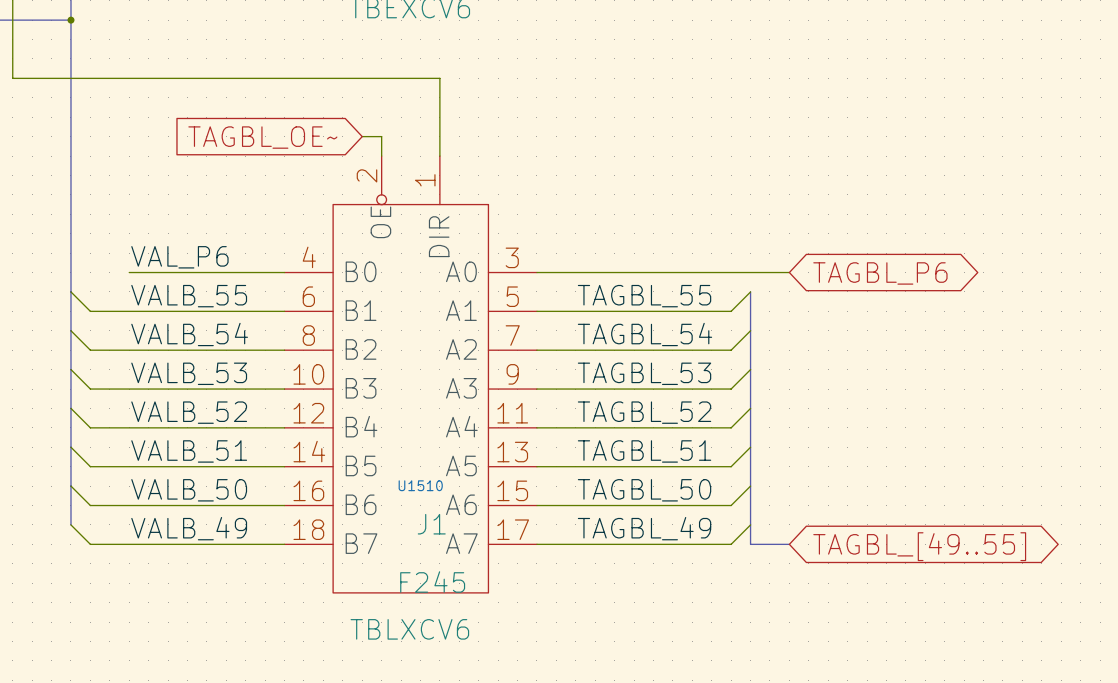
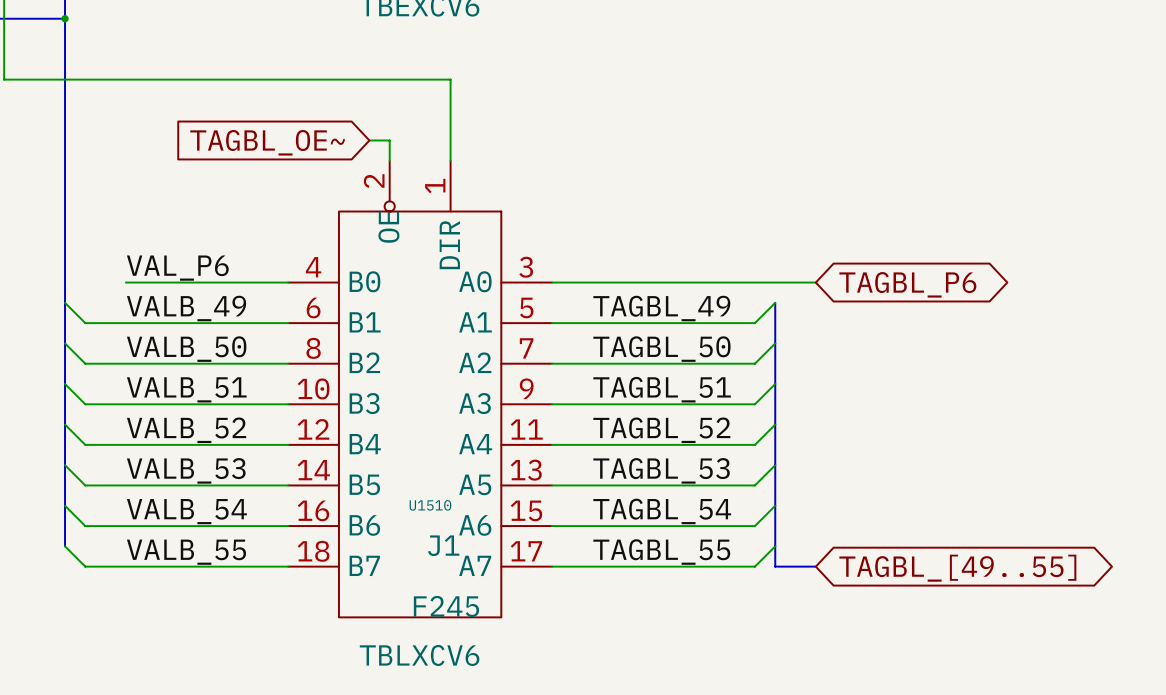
label: VALB_55 (189, 296) -> VALB_49 (186, 308)
label: TAGBL_55 (644, 296) -> TAGBL_49 (661, 308)
label: VALB_54 (189, 334) -> VALB_50 (186, 349)
label: TAGBL_54 (644, 334) -> TAGBL_50 (661, 349)
label: VALB_53 (189, 373) -> VALB_51 (186, 389)
label: TAGBL_53 (644, 373) -> TAGBL_51 (662, 389)
label: VALB_51 (189, 451) -> VALB_53 (186, 470)
label: TAGBL_51 (644, 451) -> TAGBL_53 (661, 470)
label: VALB_50 (189, 490) -> VALB_54 (186, 511)
label: TAGBL_50 (644, 490) -> TAGBL_54 (662, 511)
label: VALB_49 (189, 528) -> VALB_55 (186, 552)
label: TAGBL_49 (644, 528) -> TAGBL_55 (661, 552)

